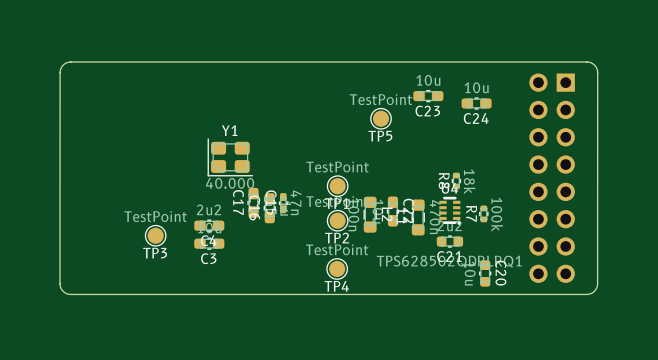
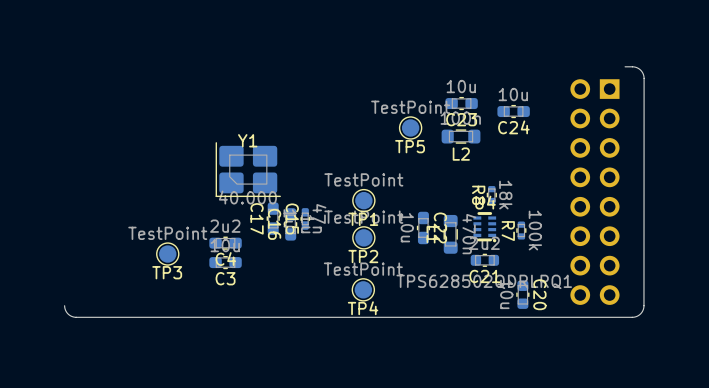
board edge: (580, 61) (66, 63) (61, 67) (60, 72) (59, 283) -> none
Y1 footprint: [207, 138, 254, 177] -> [215, 142, 281, 198]
L2 rotation: 0° (370, 214) -> 90° clockwise (461, 136)
L2 position: (370, 214) -> (461, 136)

